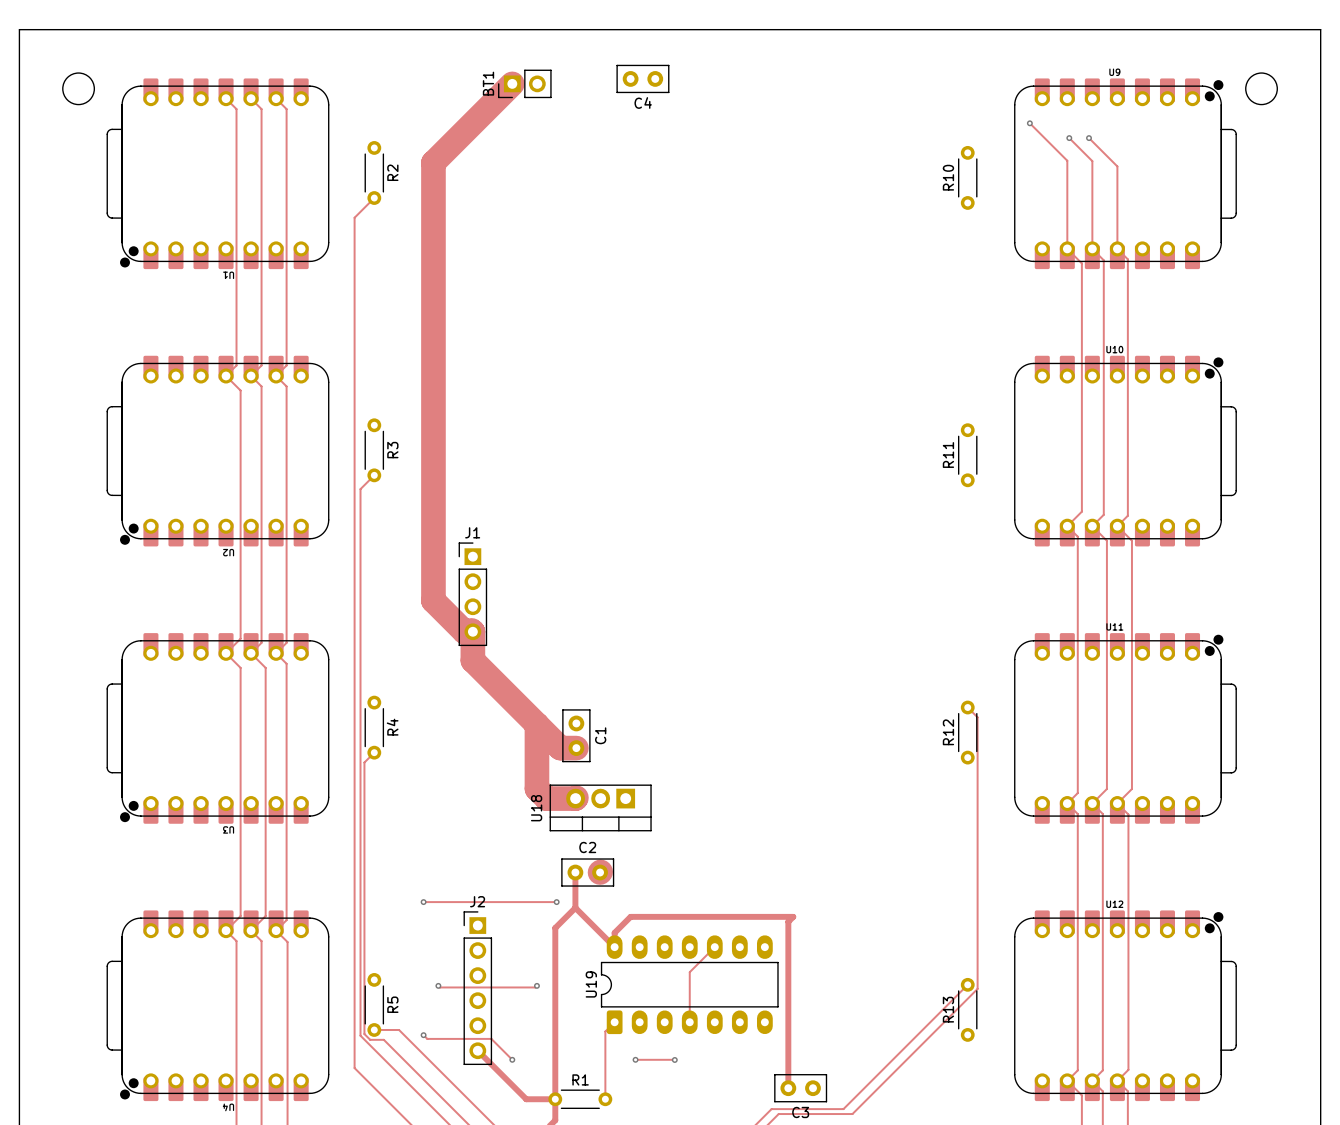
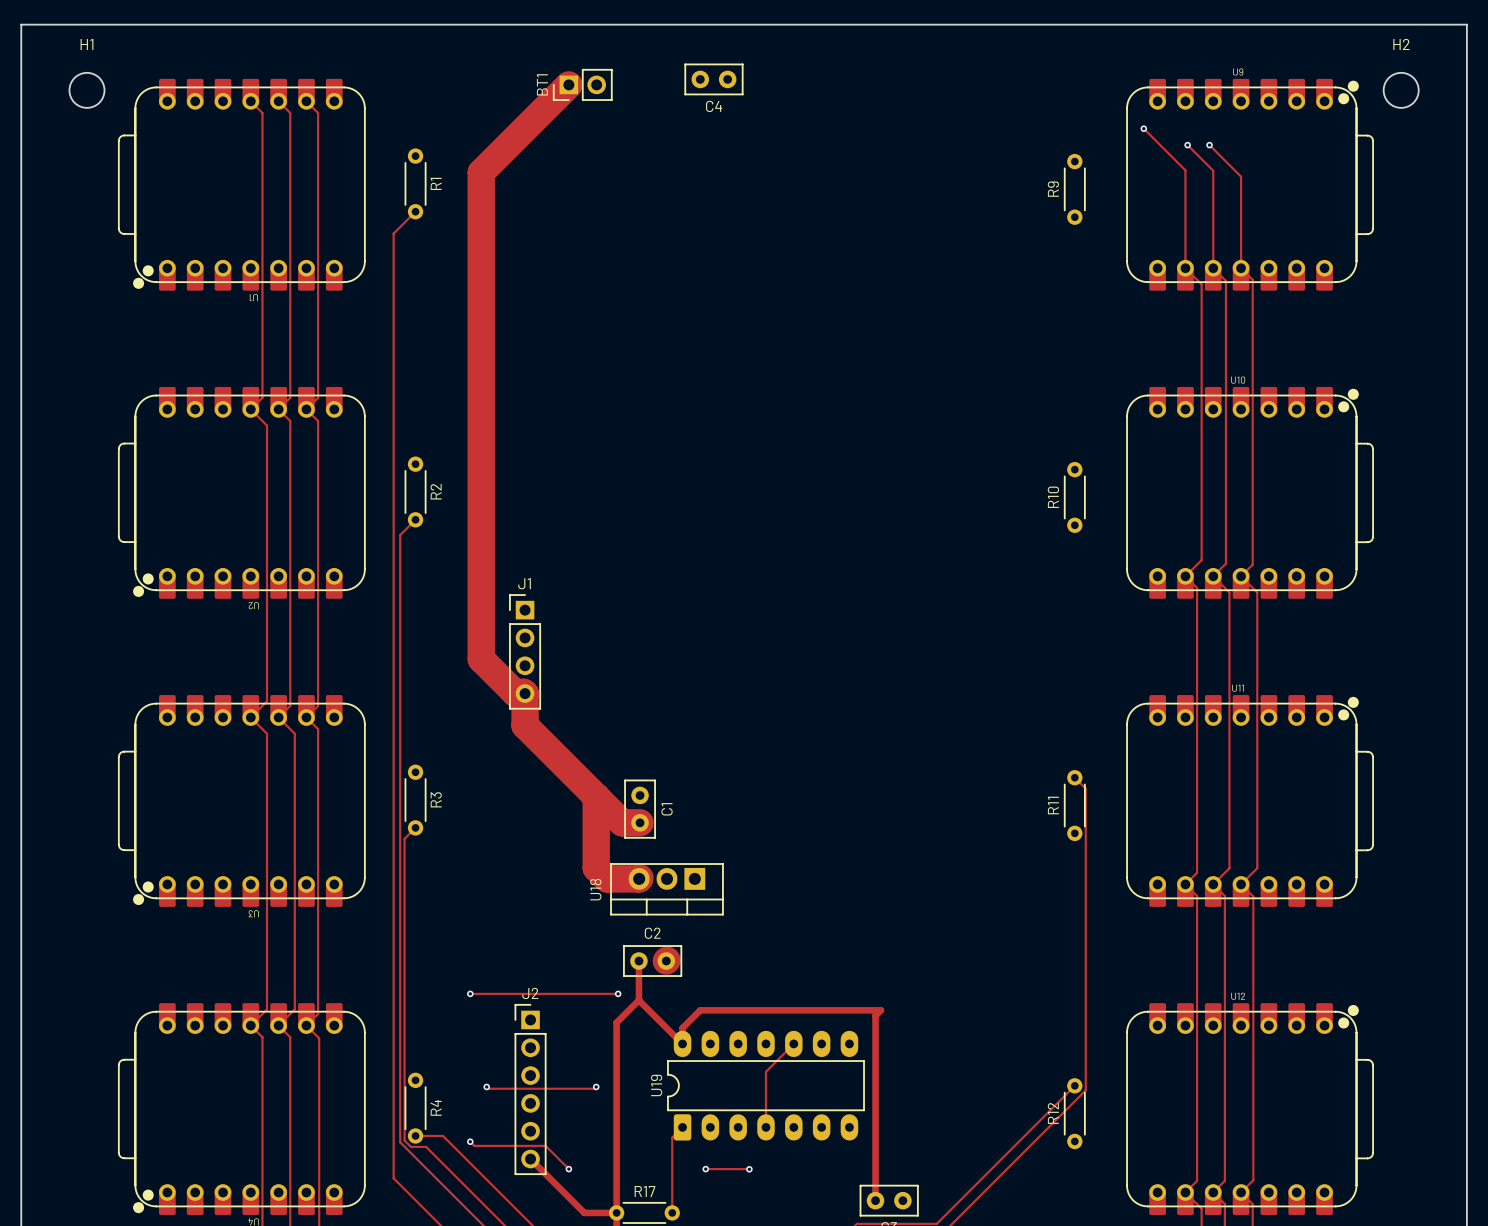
H1 name: none -> H1 (86, 44)
H2 name: none -> H2 (1401, 44)
R2 name: R2 (392, 172) -> R1 (436, 183)
R10 name: R10 (948, 177) -> R9 (1053, 189)
R3 name: R3 (392, 450) -> R2 (436, 491)
R11 name: R11 (948, 455) -> R10 (1053, 497)
R4 name: R4 (392, 727) -> R3 (436, 799)
R12 name: R12 (948, 732) -> R11 (1053, 805)
R5 name: R5 (392, 1004) -> R4 (436, 1107)
R13 name: R13 (948, 1009) -> R12 (1053, 1113)
R1 name: R1 (580, 1079) -> R17 (644, 1191)

